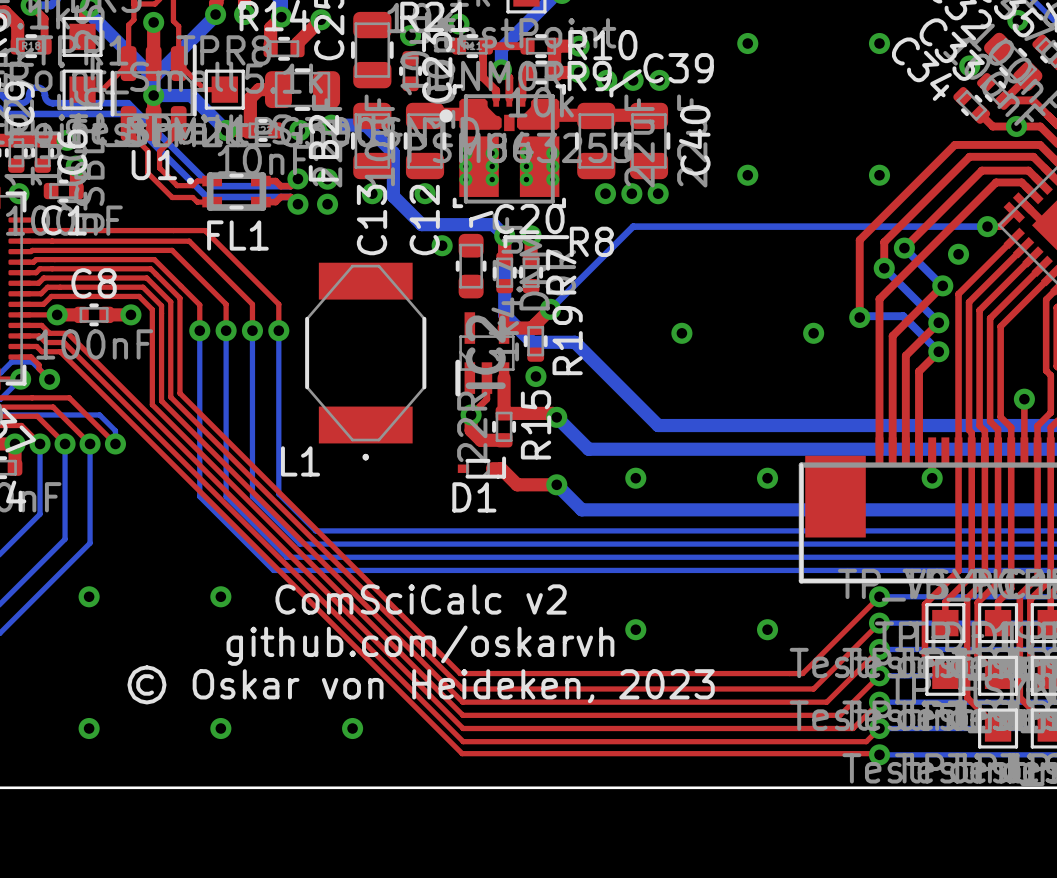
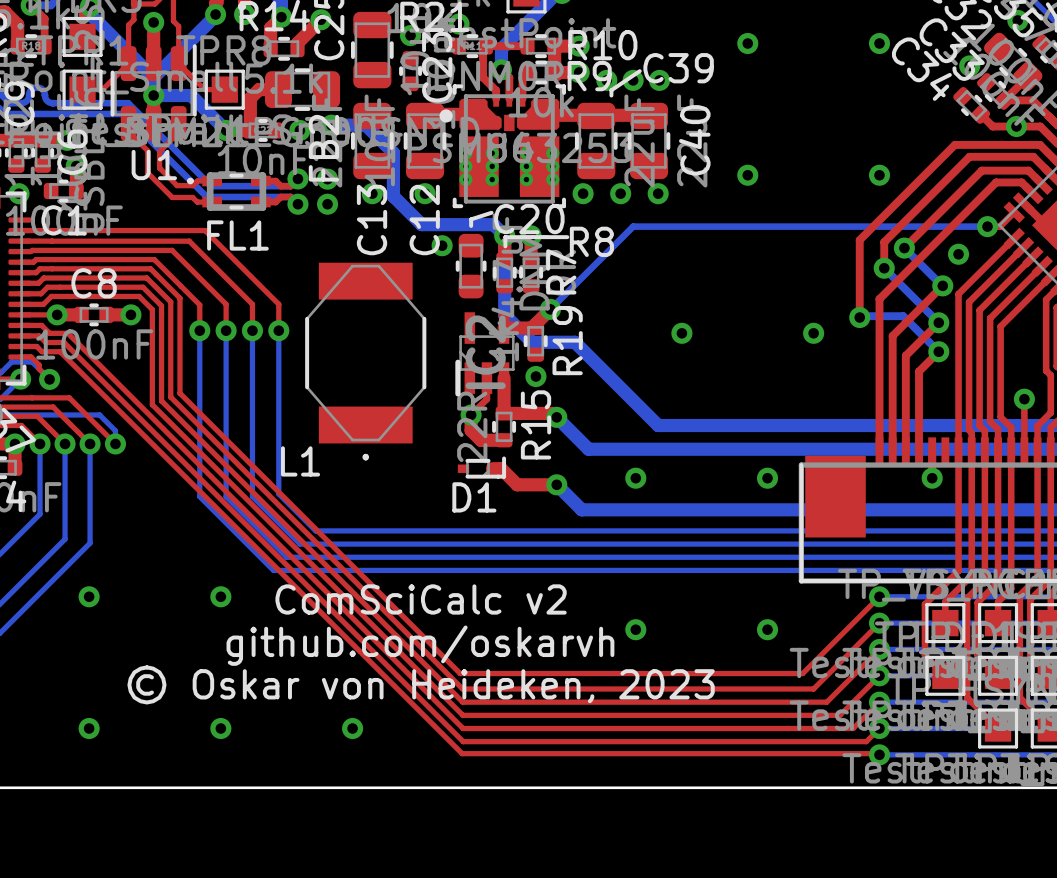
via: none -> (583, 193)
via: (605, 193) -> none
via: none -> (620, 193)
via: (631, 193) -> none

